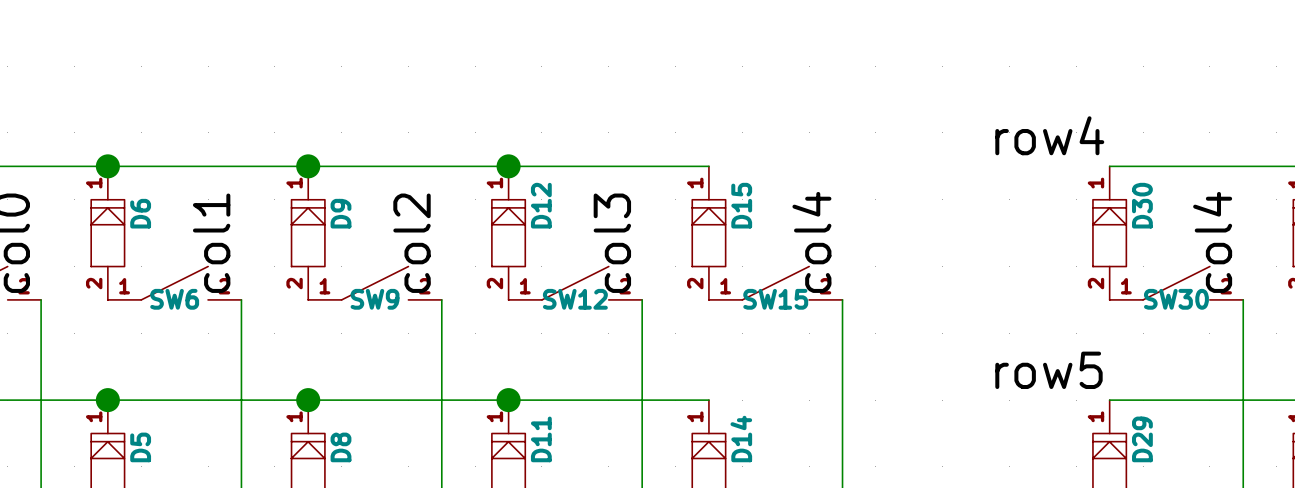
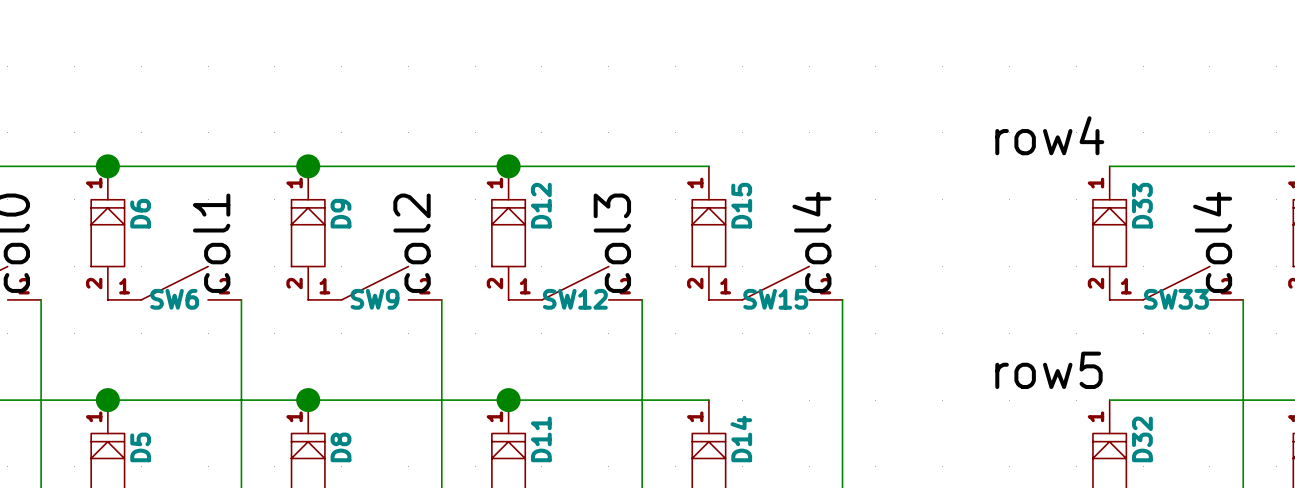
D30 name: D30 (1142, 205) -> D33 (1142, 205)
SW30 name: SW30 (1176, 299) -> SW33 (1176, 299)
D29 name: D29 (1142, 439) -> D32 (1142, 439)

